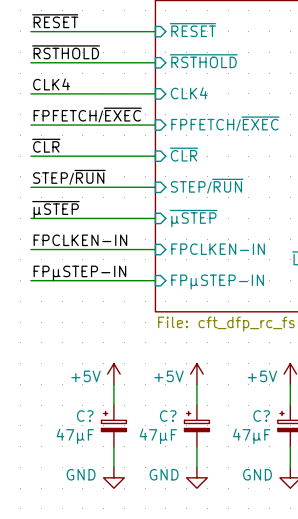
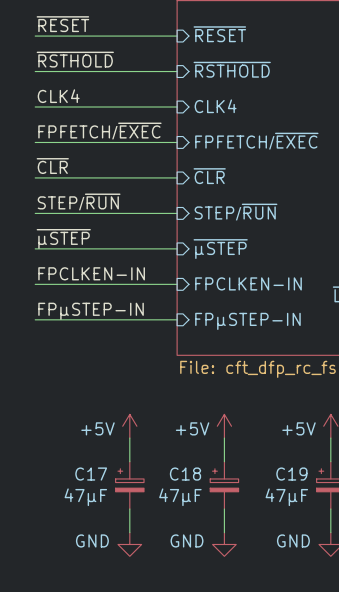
C? name: C? (85, 416) -> C17 (91, 474)
C? name: C? (168, 416) -> C18 (185, 474)
C? name: C? (261, 416) -> C19 (291, 474)

